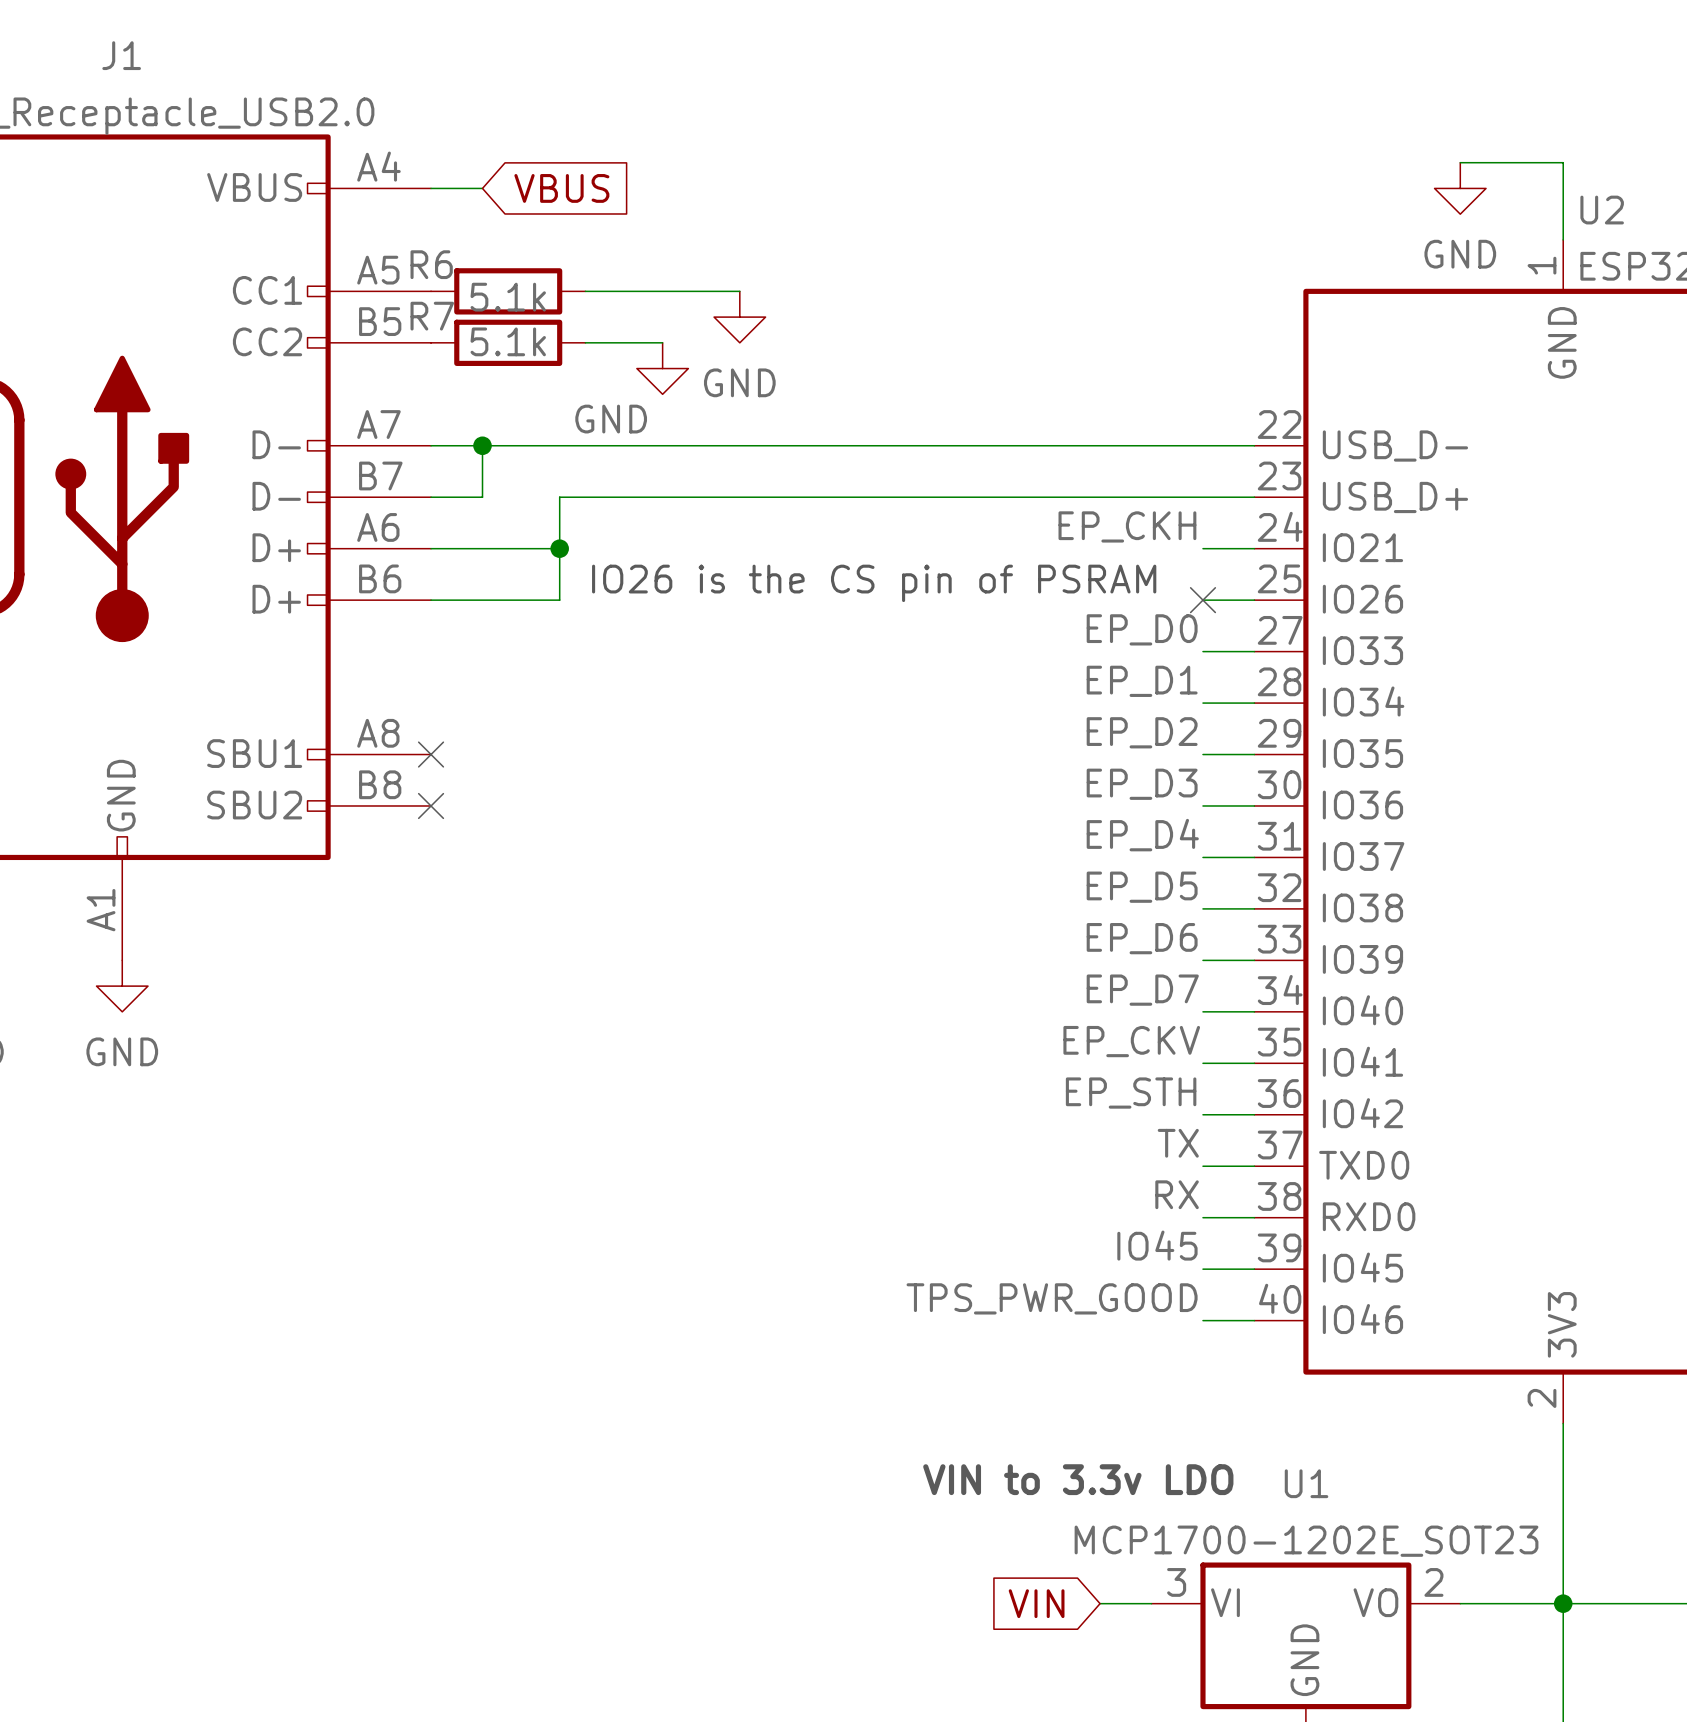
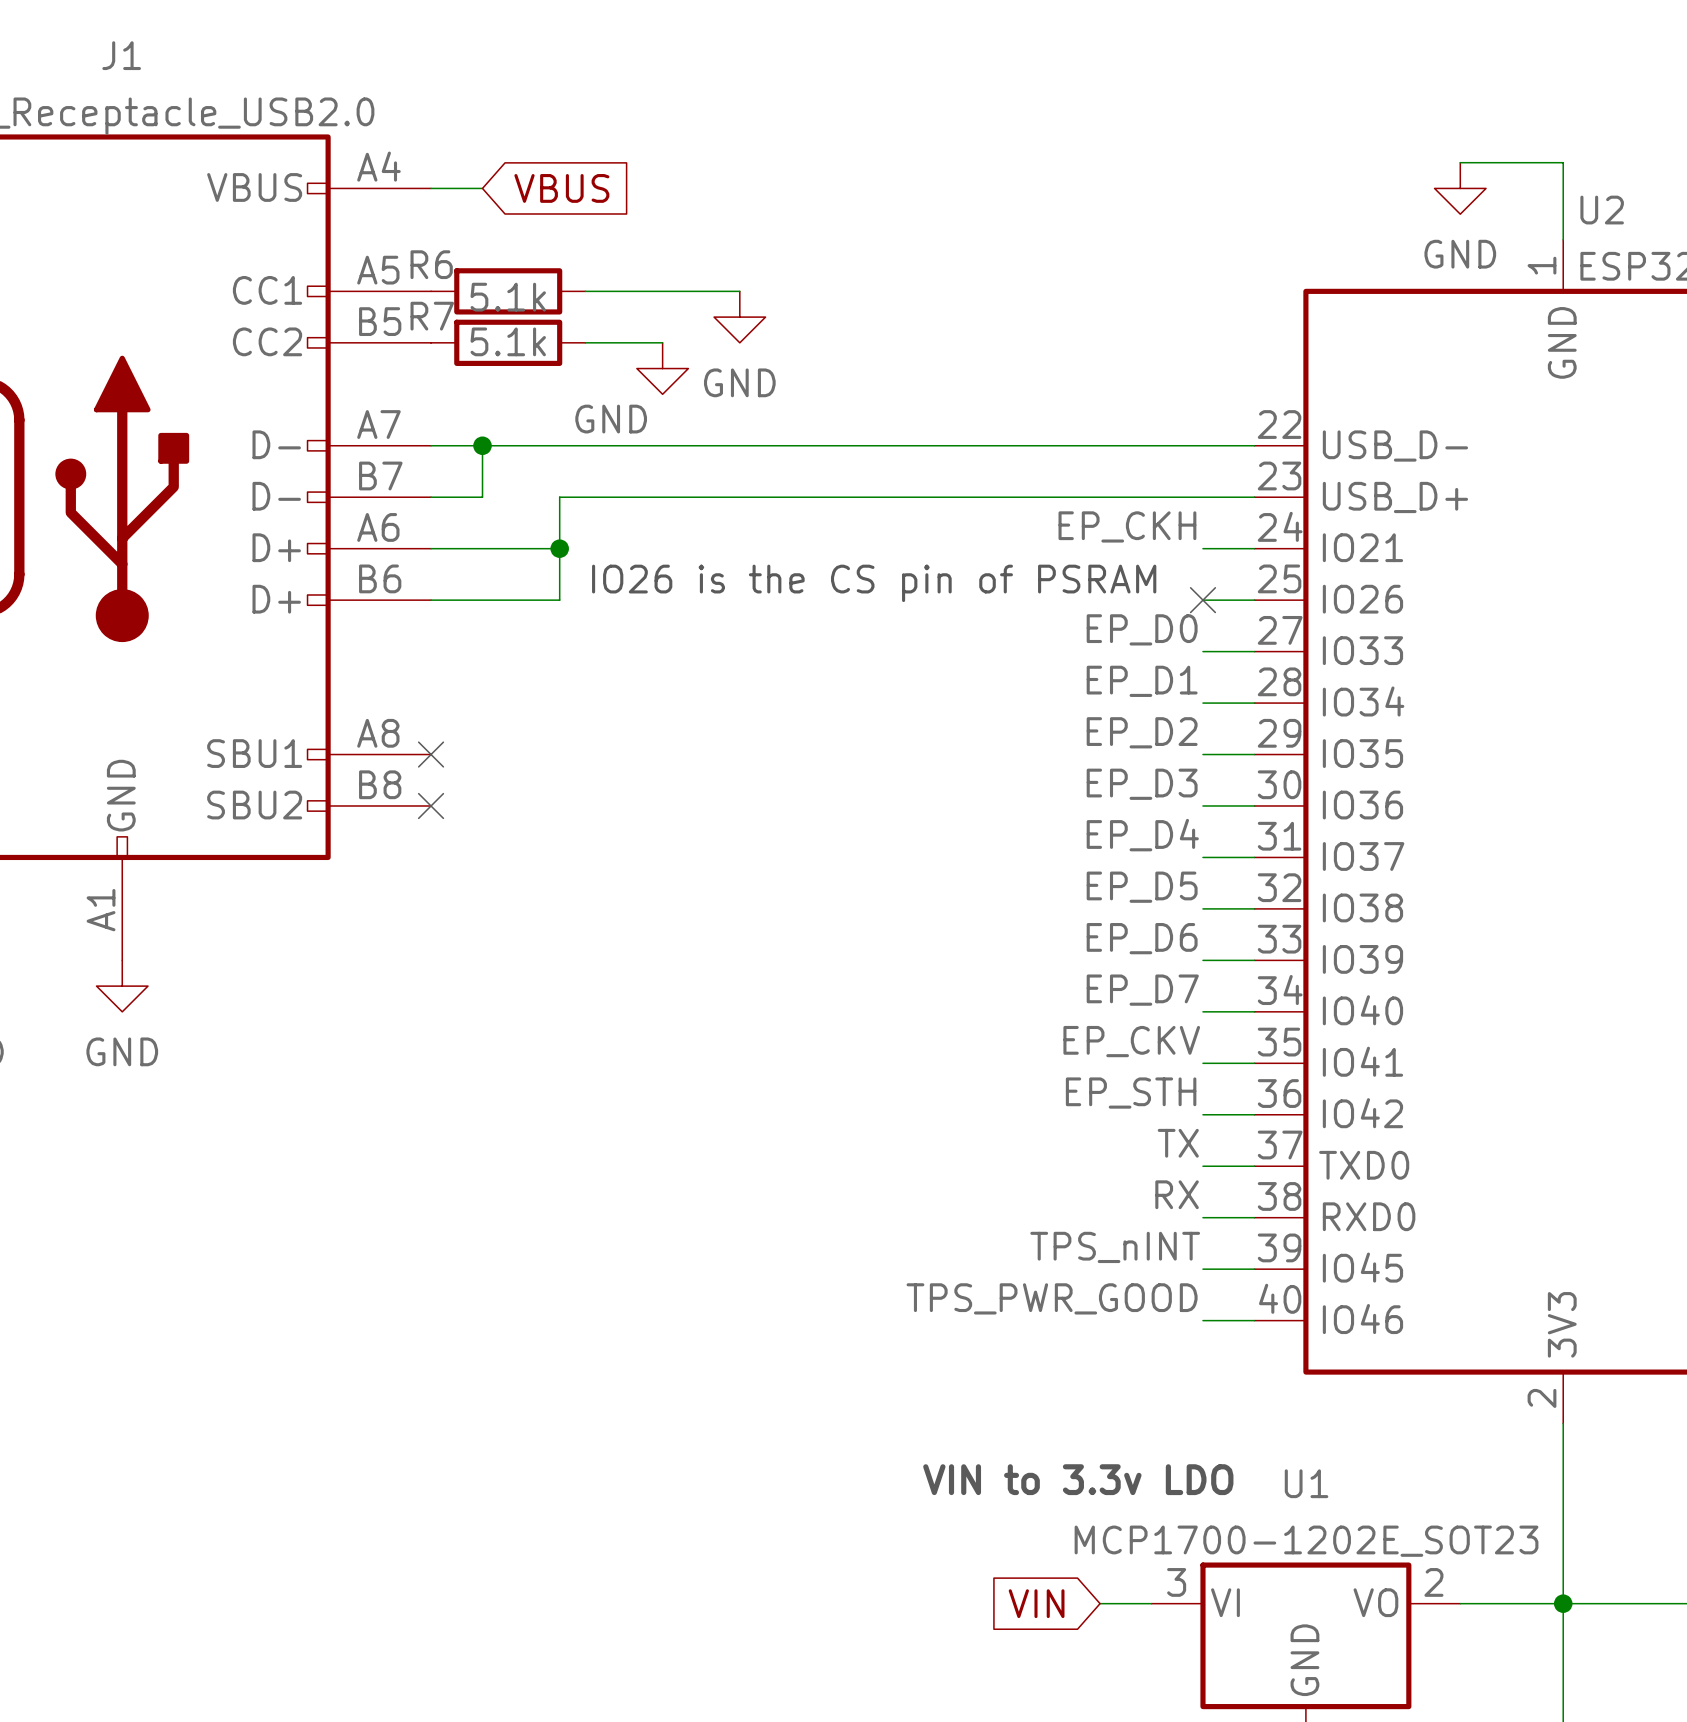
label: IO45 (1157, 1245) -> TPS_nINT (1115, 1247)

